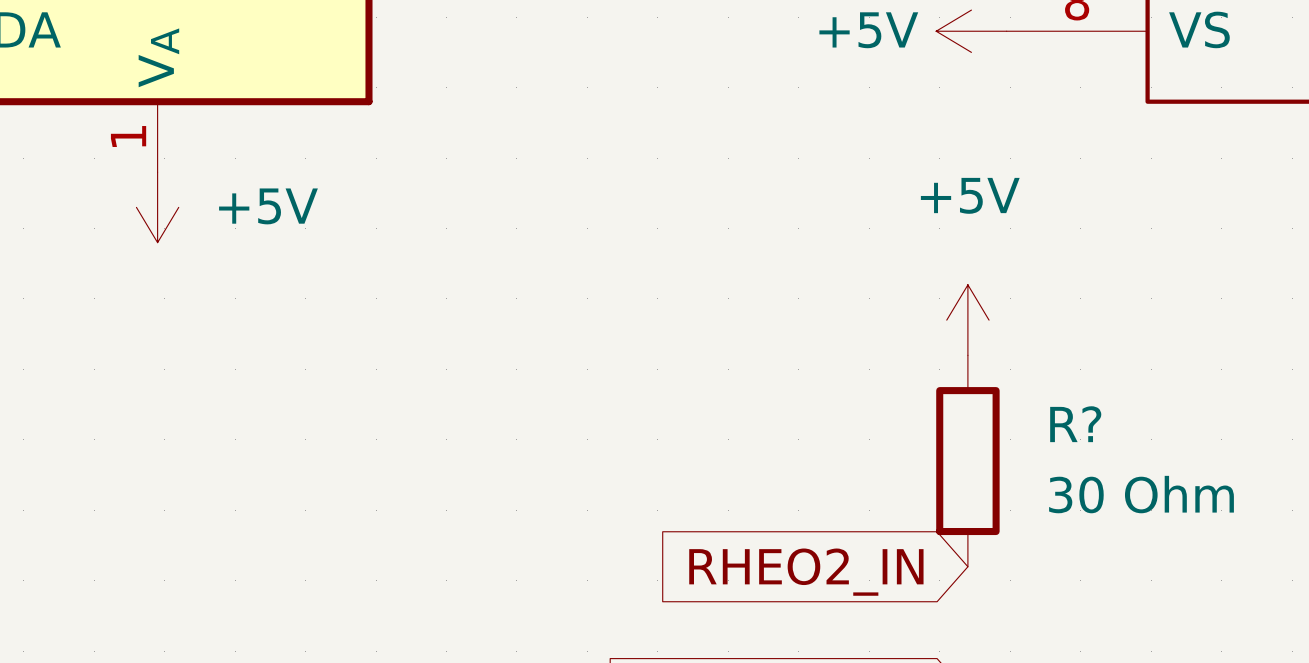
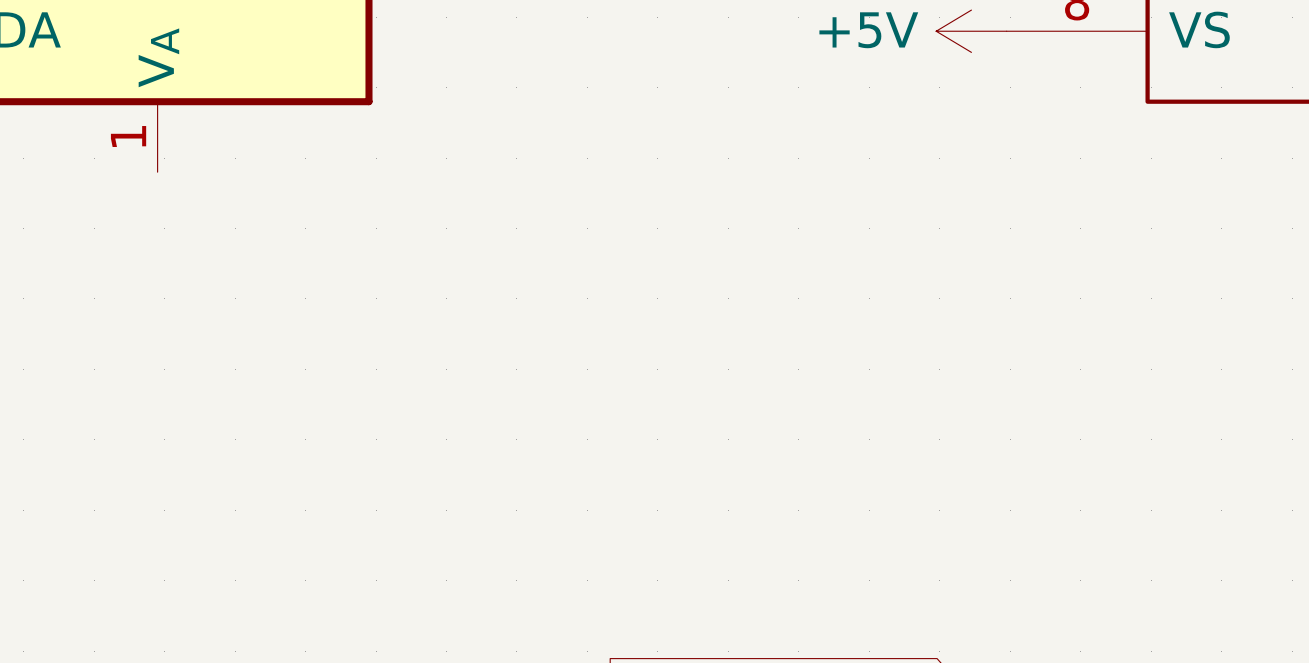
power symbol: +5V (157, 207) -> none
power symbol: +5V (967, 320) -> none
R?: 30 Ohm (967, 461) -> none
global label: RHEO2_IN (806, 572) -> none

